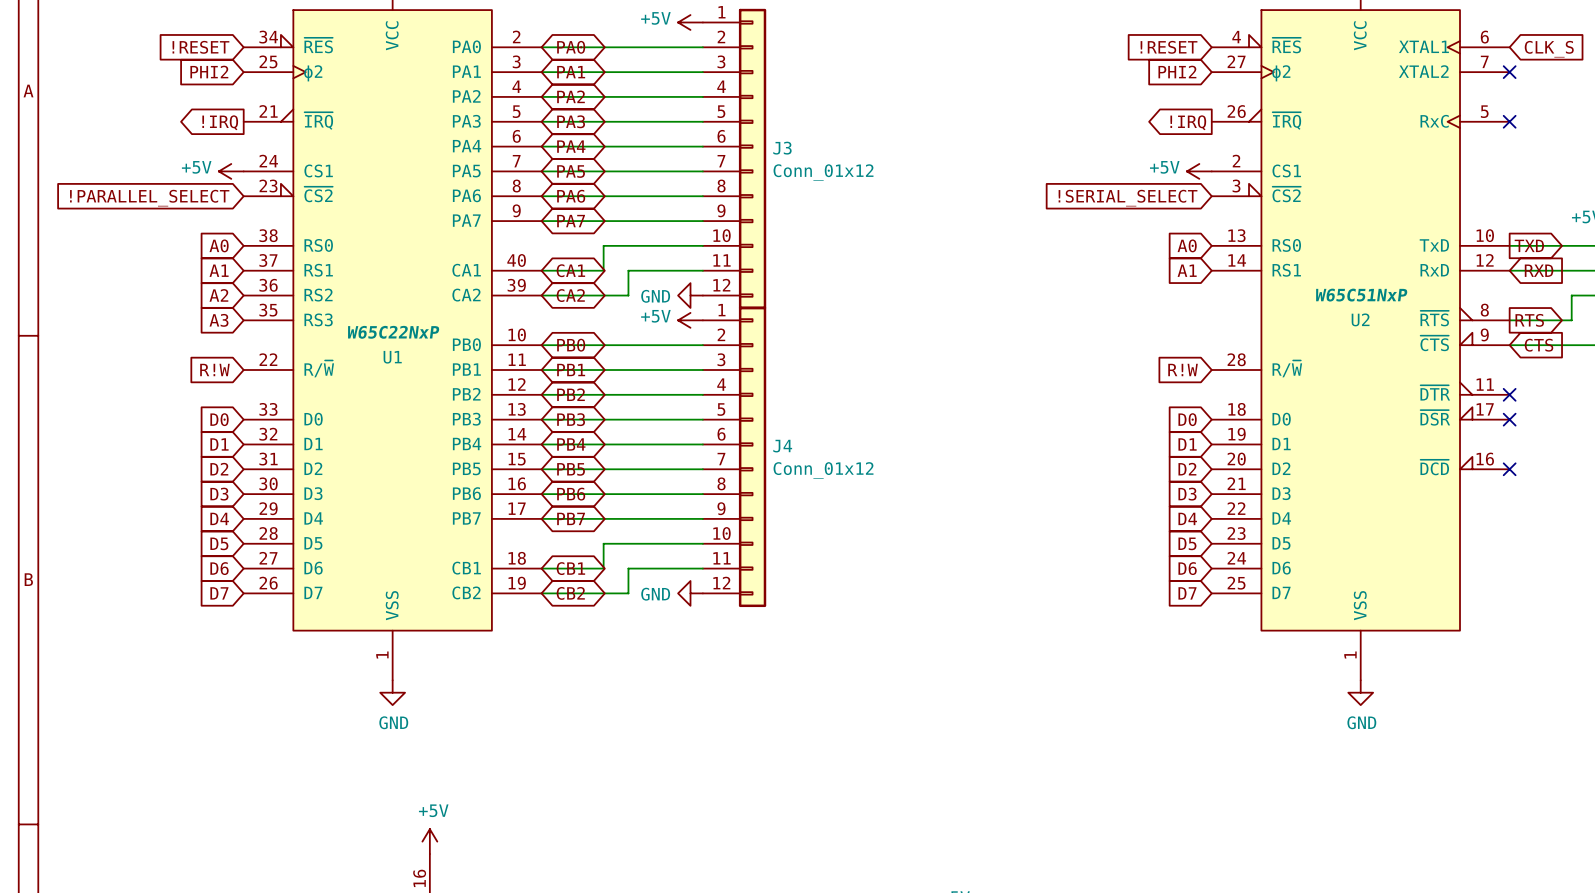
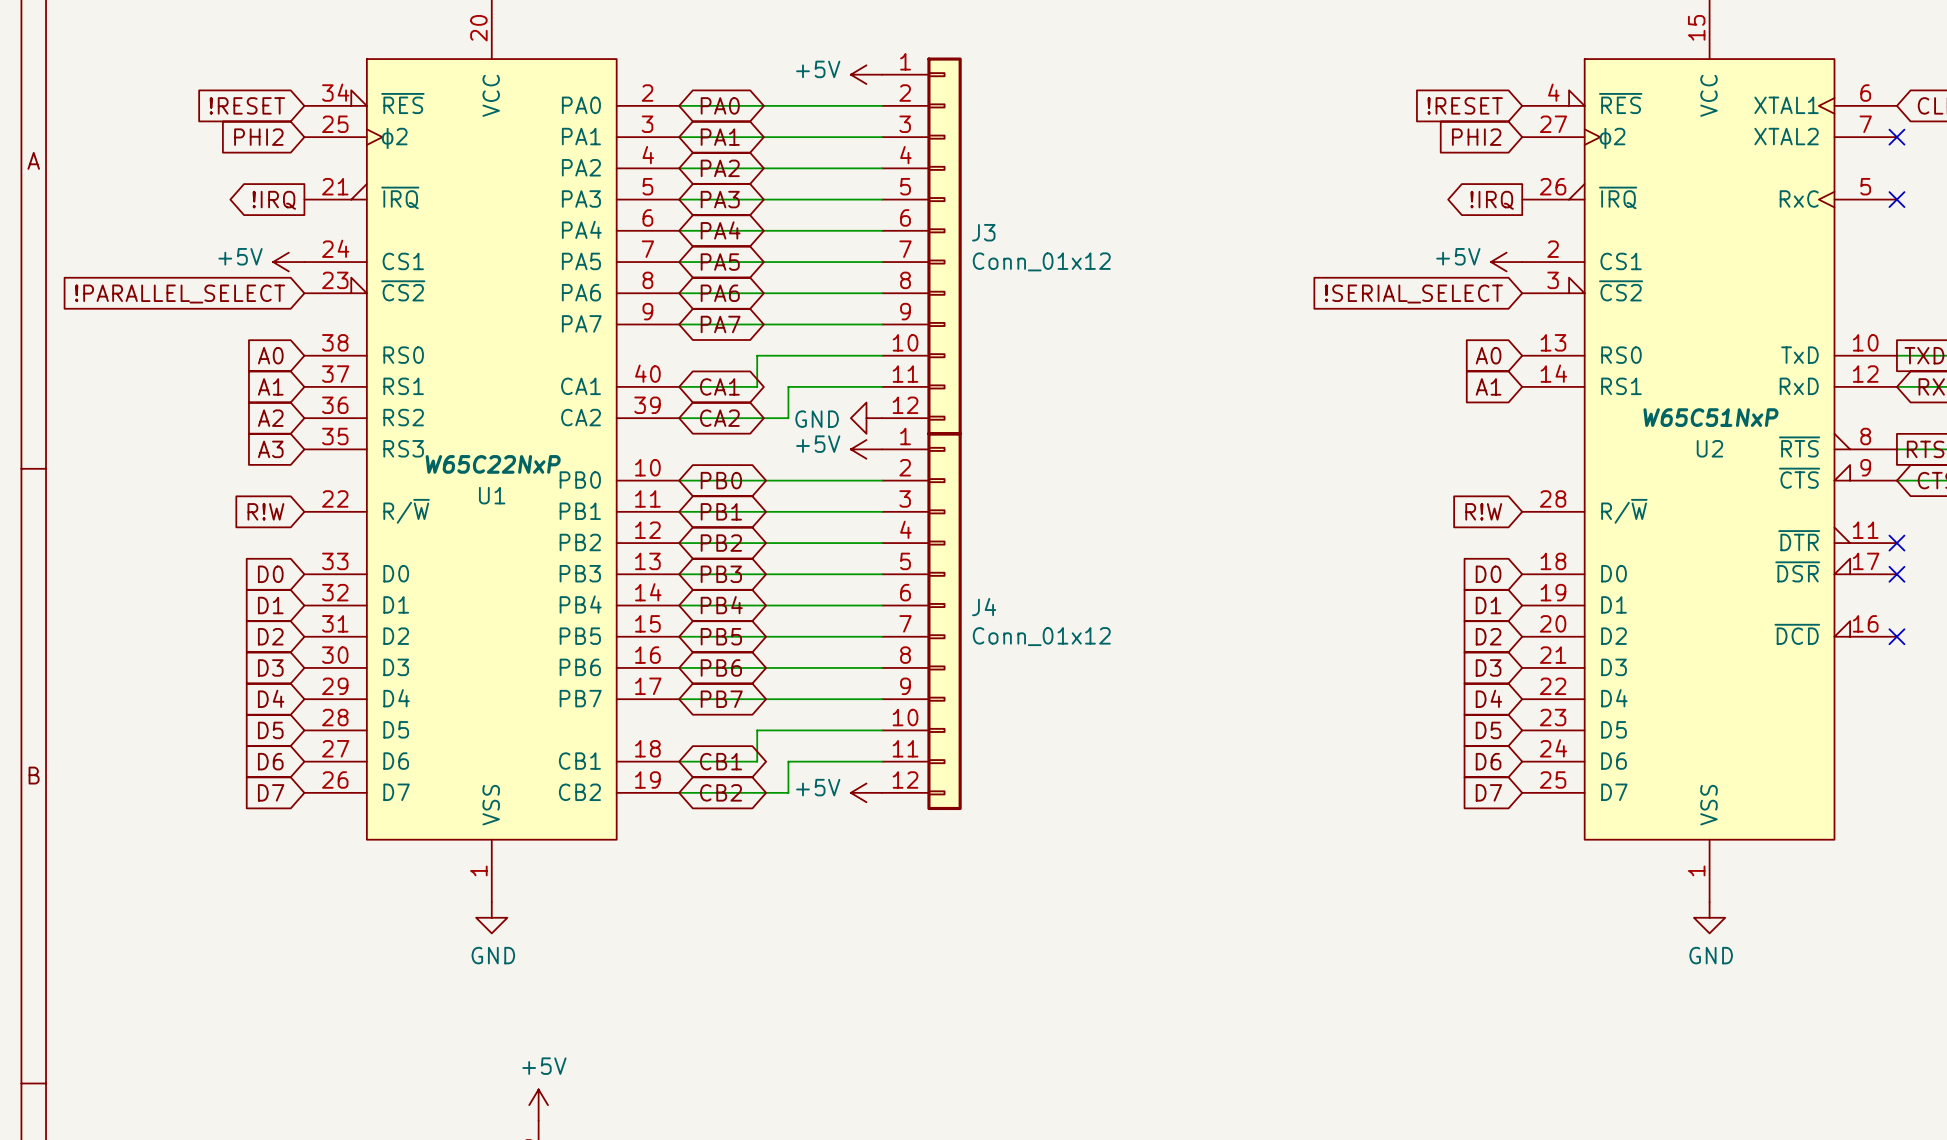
power symbol: GND (690, 593) -> +5V (866, 792)

